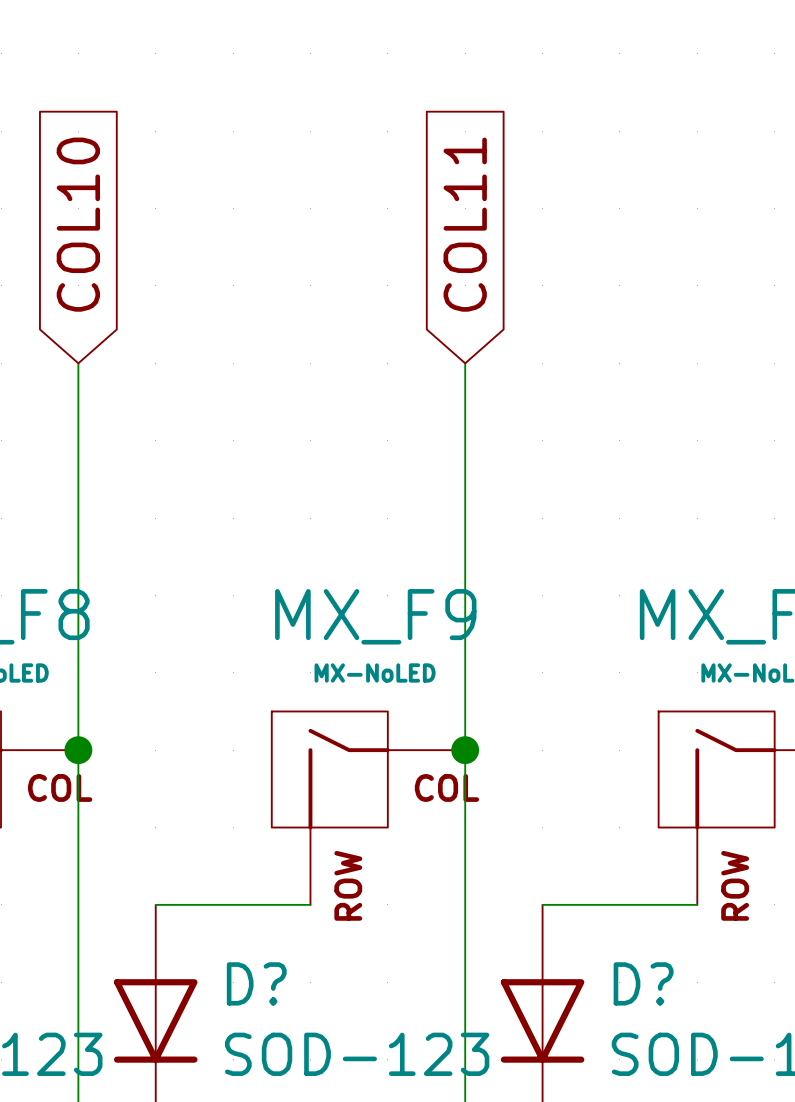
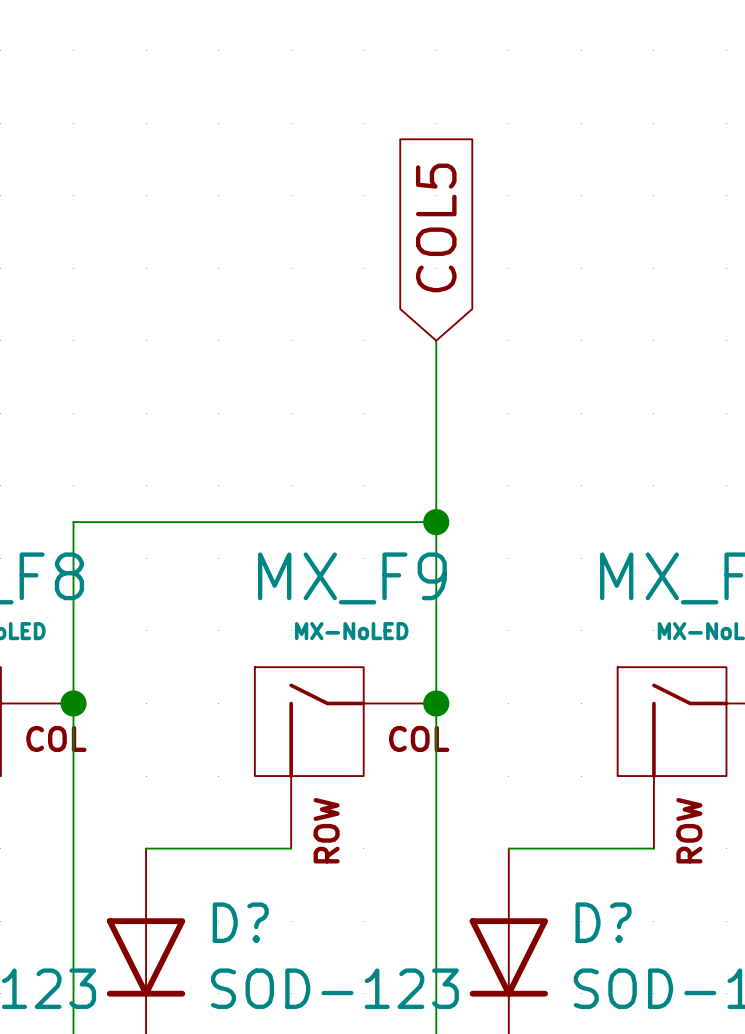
global label: COL10 (78, 224) -> none
global label: COL11 (465, 224) -> COL5 (436, 227)
wire: (78, 363) (78, 556) -> (436, 522) (73, 522)
junction: none -> (436, 522)

